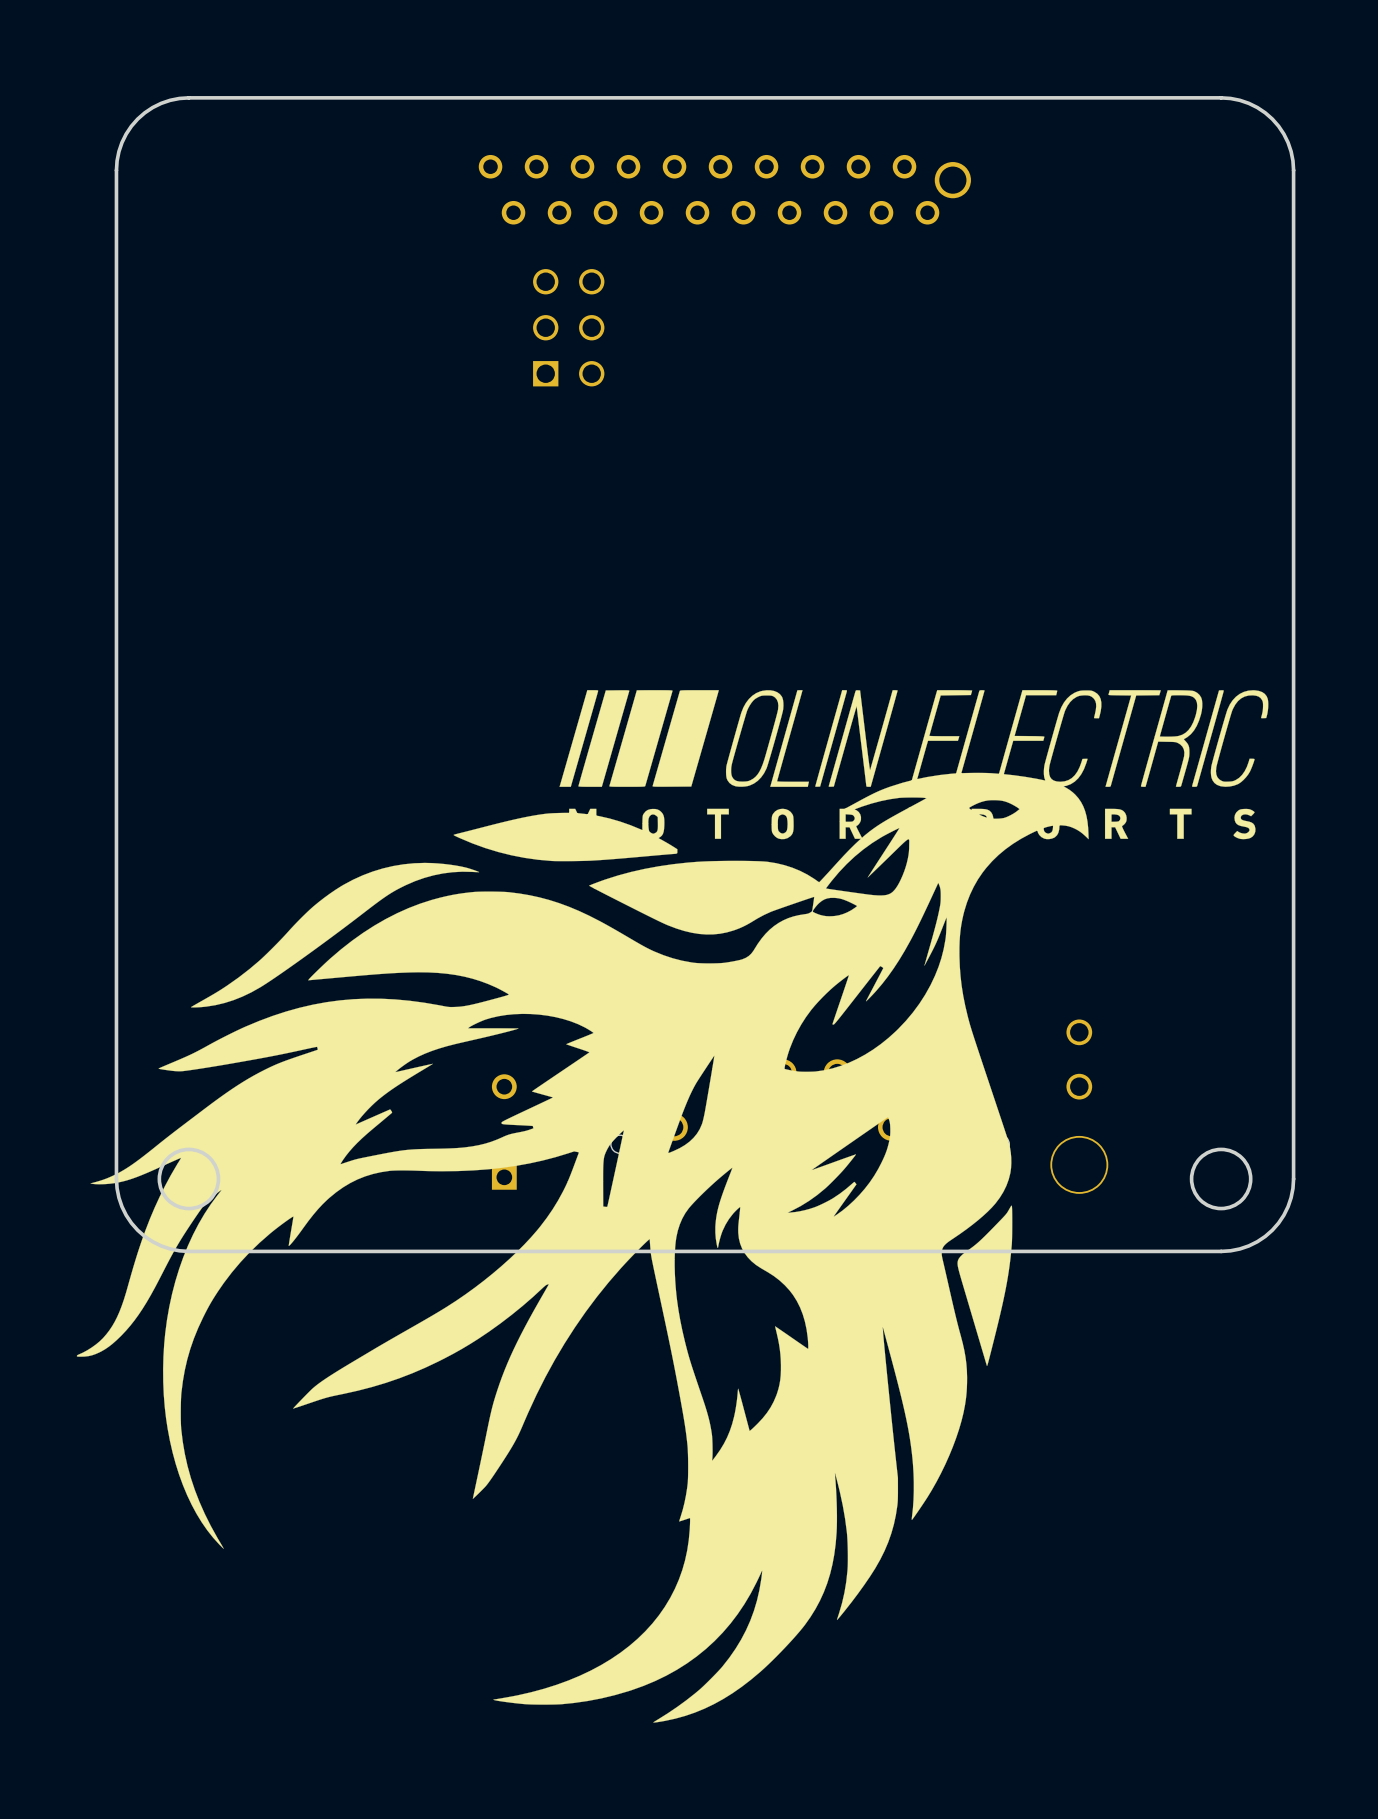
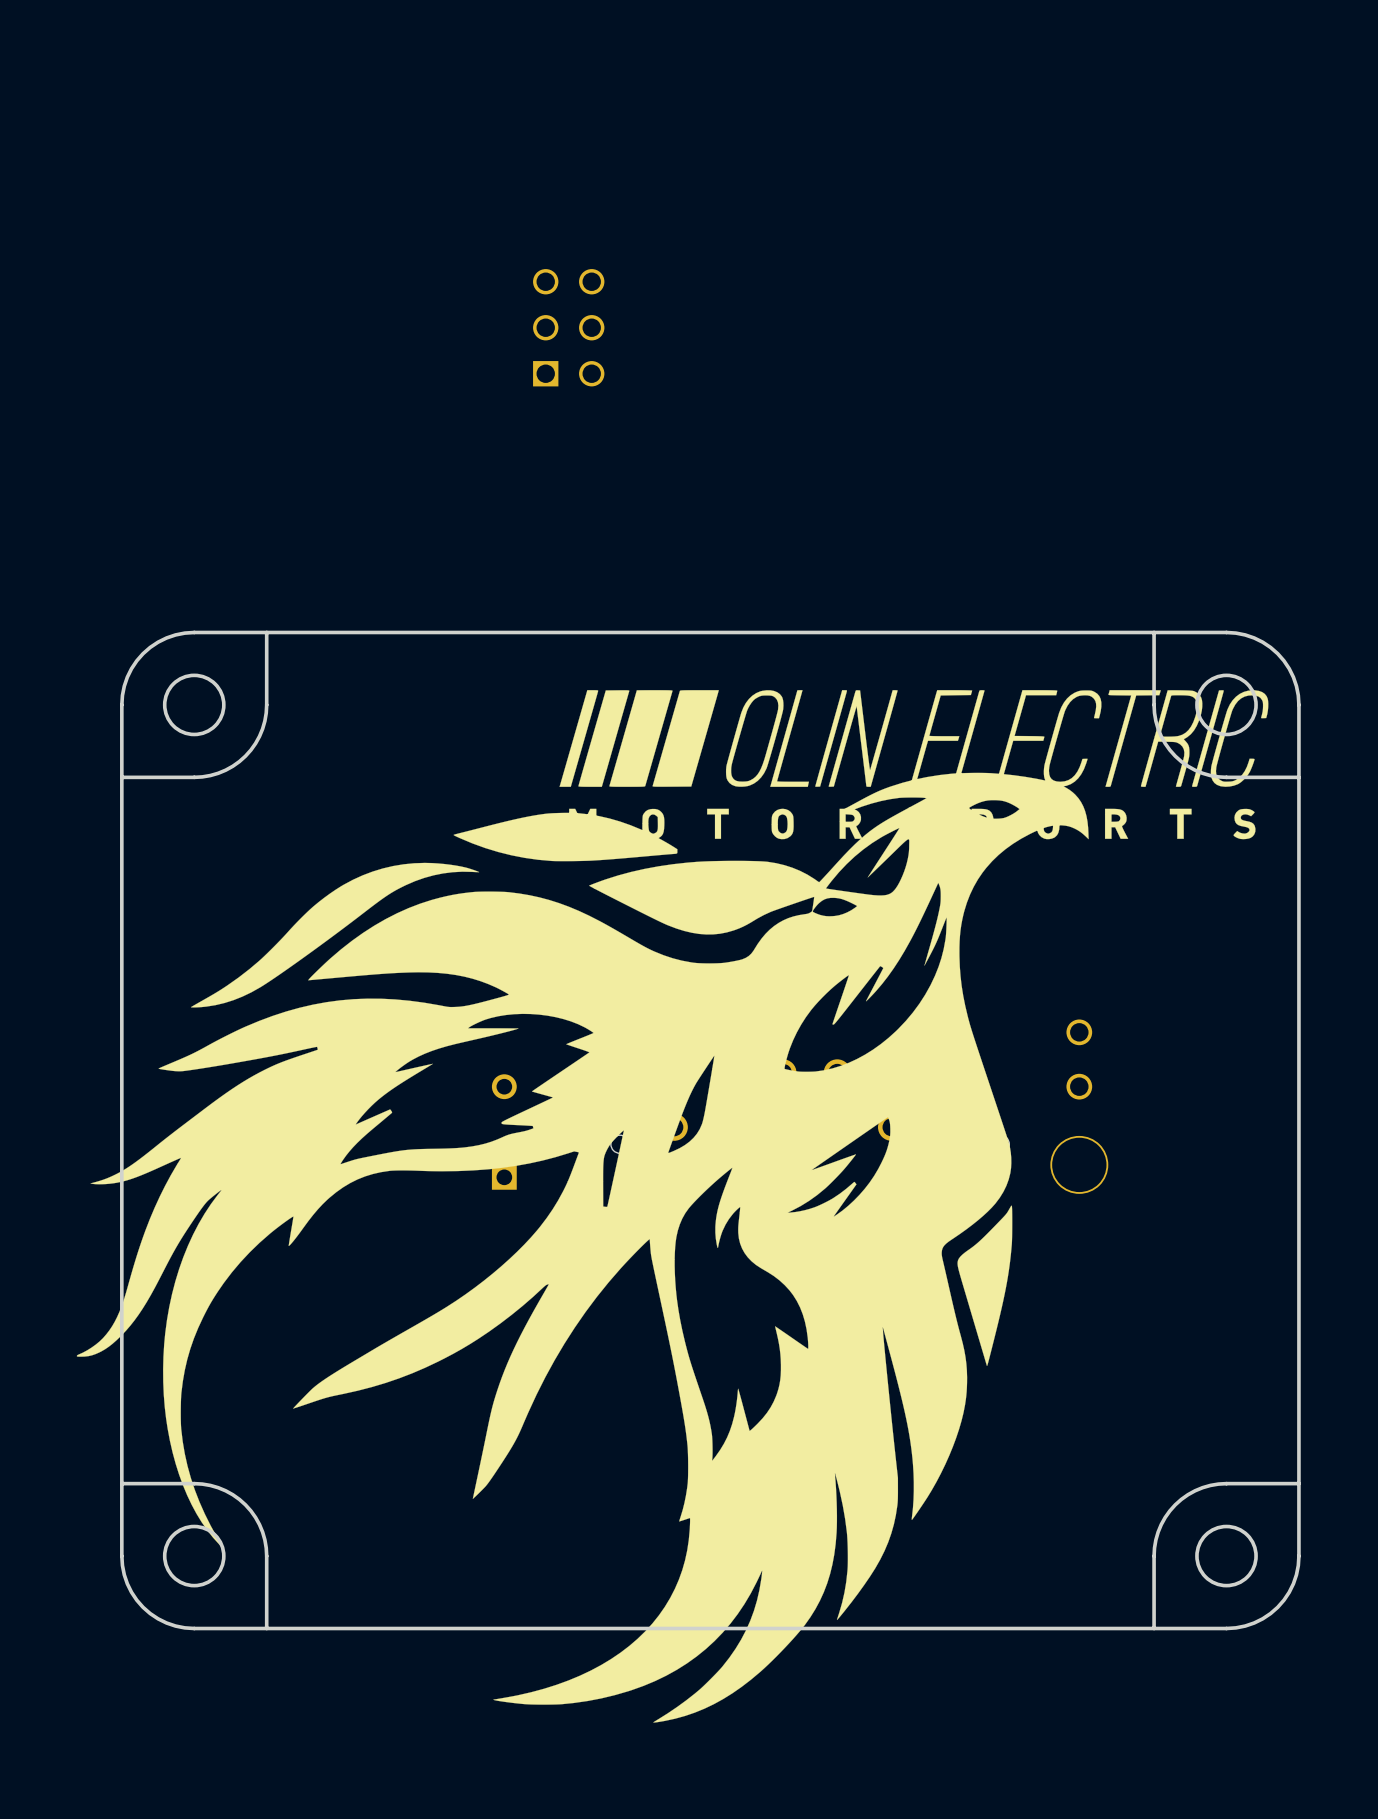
board edge: (1221, 97) (188, 97) (161, 103) (137, 119) (121, 142) (116, 170) (116, 1178) (121, 1206) (137, 1230) (161, 1245) (188, 1251) (1221, 1251) (1248, 1245) (1272, 1230) (1288, 1206) (1293, 1178) (1293, 170) (1288, 142) (1272, 119) (1248, 103) (1221, 97) -> none
part: (724, 189) -> none
board edge: none -> (266, 632) (264, 721) (259, 736) (245, 756) (232, 766) (210, 775) (121, 777)
board edge: none -> (1154, 632) (1155, 721) (1165, 743) (1175, 756) (1187, 766) (1210, 775) (1298, 777)
board edge: none -> (1226, 632) (194, 632) (166, 637) (143, 653) (127, 677) (121, 704) (121, 1556) (127, 1583) (143, 1607) (166, 1622) (194, 1628) (1226, 1628) (1254, 1622) (1277, 1607) (1293, 1583) (1298, 1556) (1298, 704) (1293, 677) (1277, 653) (1254, 637) (1226, 632)
round board edge: none -> [162, 673, 226, 737]
round board edge: none -> [1195, 673, 1258, 737]
round board edge: [157, 1147, 221, 1211] -> none
round board edge: [1189, 1147, 1253, 1211] -> none
board edge: none -> (121, 1483) (210, 1485) (225, 1490) (245, 1504) (255, 1517) (264, 1539) (266, 1628)
board edge: none -> (1298, 1483) (1210, 1485) (1187, 1494) (1175, 1504) (1165, 1517) (1155, 1539) (1154, 1628)
round board edge: none -> [162, 1524, 226, 1588]
round board edge: none -> [1195, 1524, 1258, 1588]

